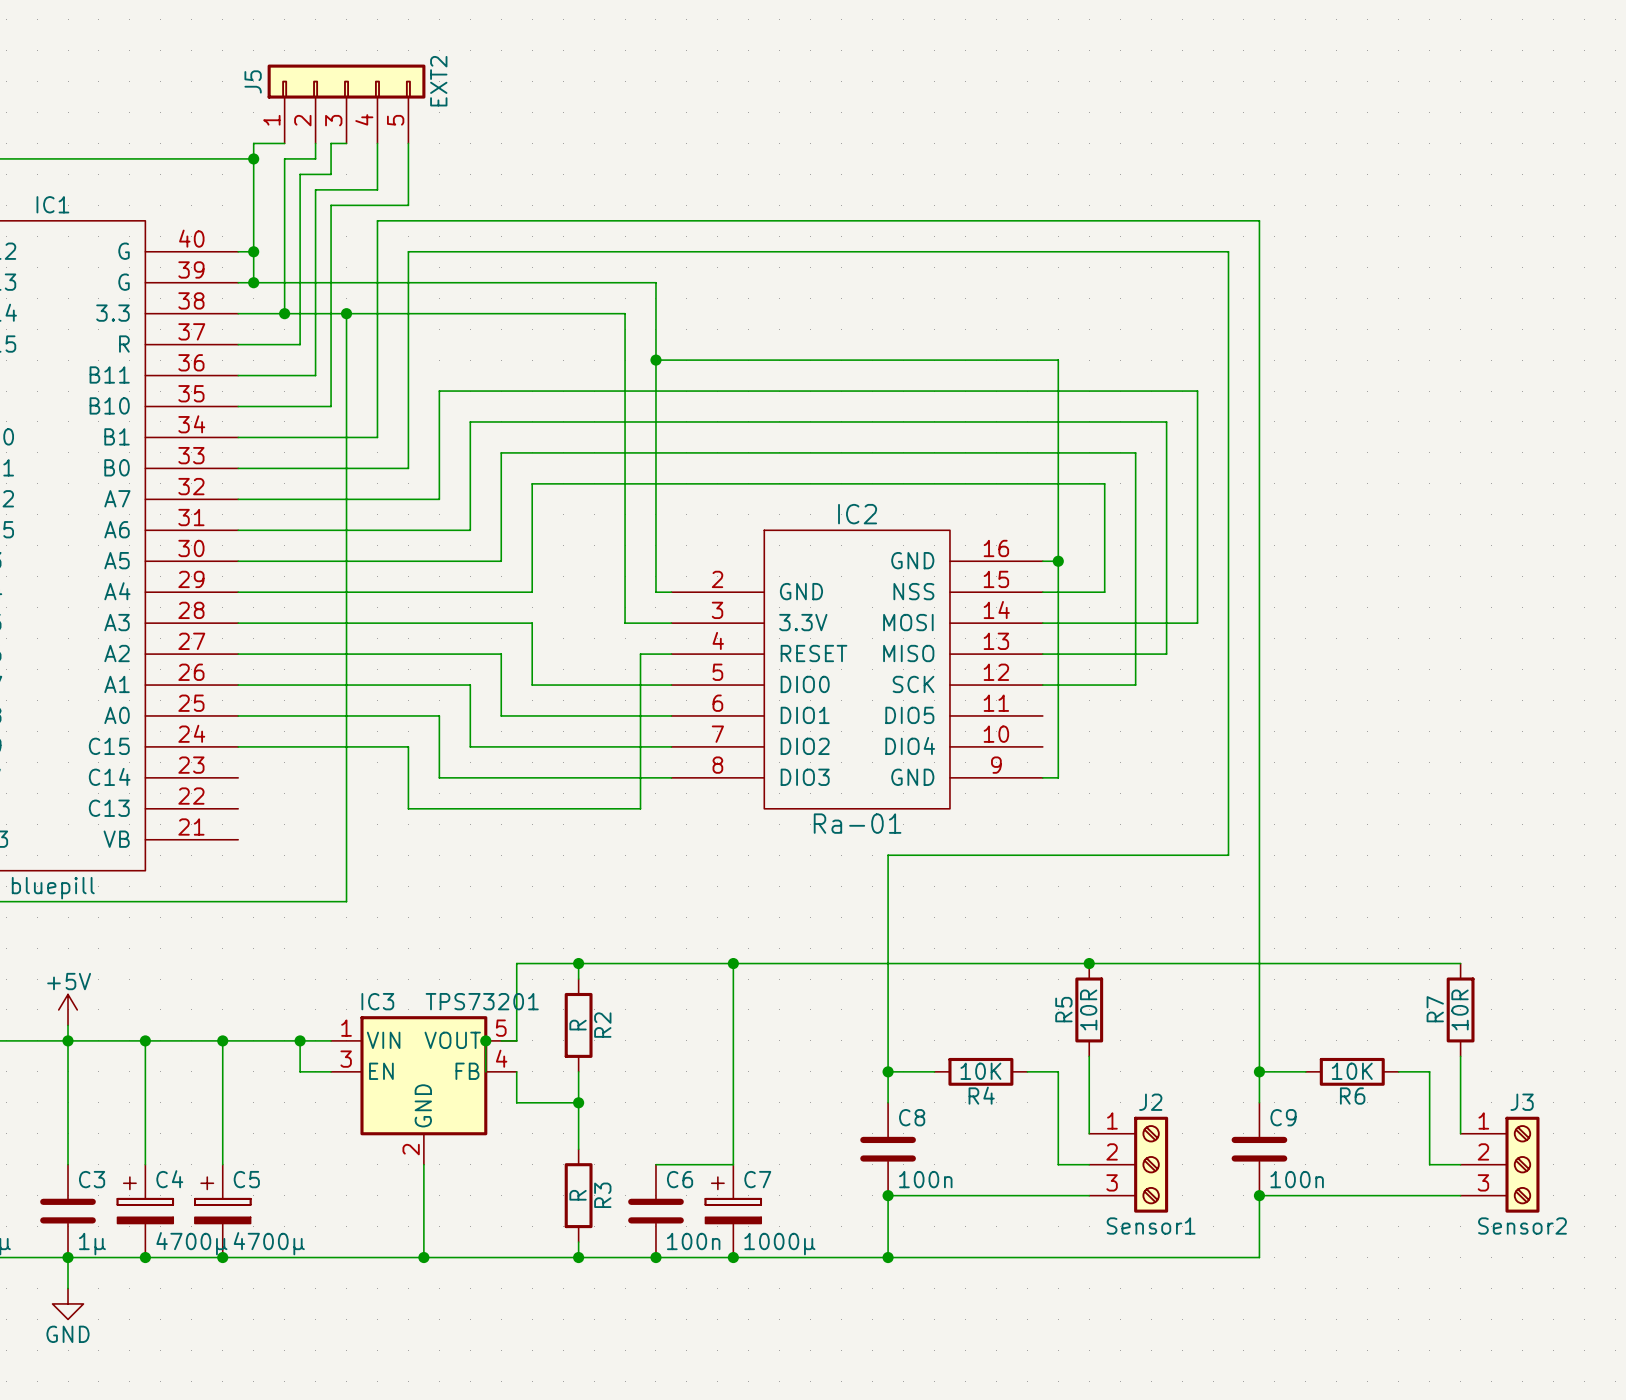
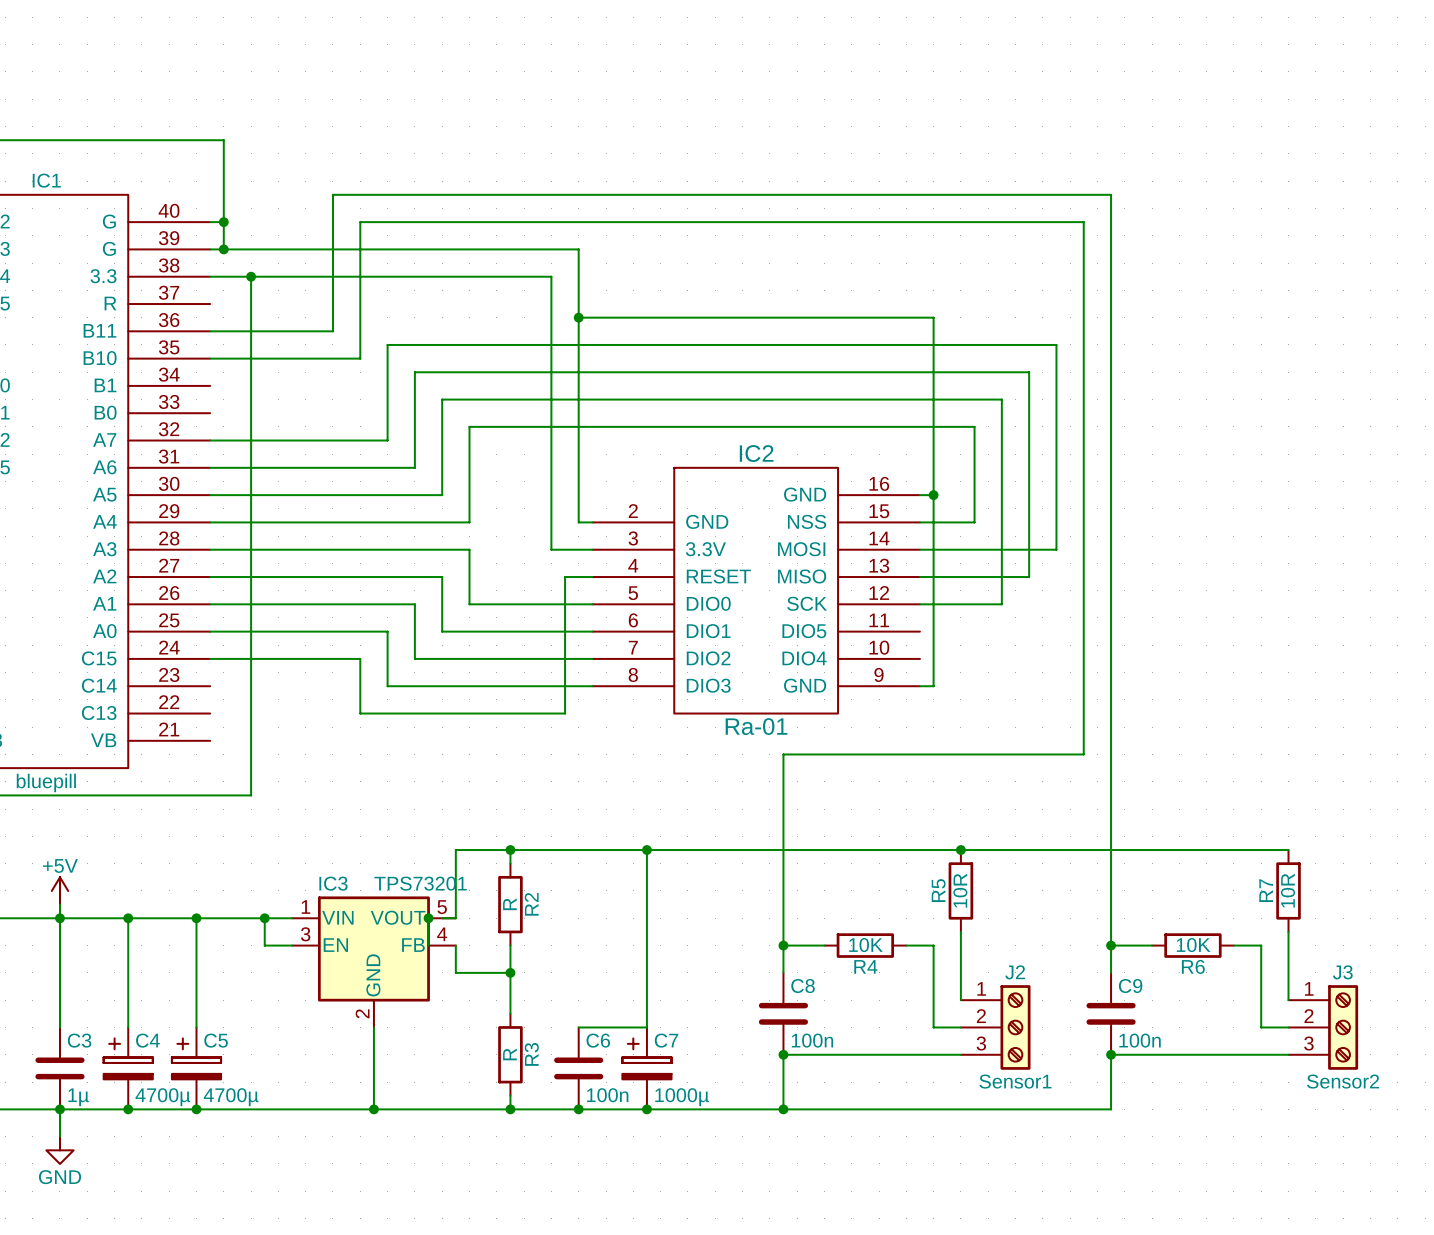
J5: EXT2 (346, 104) -> none
wire: (284, 143) (253, 143) (253, 158) -> none
wire: (315, 143) (315, 158) (284, 158) (284, 313) -> none
wire: (346, 143) (331, 143) (331, 174) (300, 174) (300, 344) (238, 344) -> none
wire: (377, 143) (377, 189) (315, 189) (315, 375) -> none
wire: (408, 143) (408, 205) (331, 205) (331, 406) -> none
junction: (253, 158) -> none
wire: (346, 313) (346, 901) (284, 901) -> (251, 276) (251, 795)
junction: (346, 313) -> none
wire: (377, 375) (377, 437) (238, 437) -> (332, 331) (278, 331)
wire: (408, 406) (408, 468) (238, 468) -> (360, 358) (292, 358)

